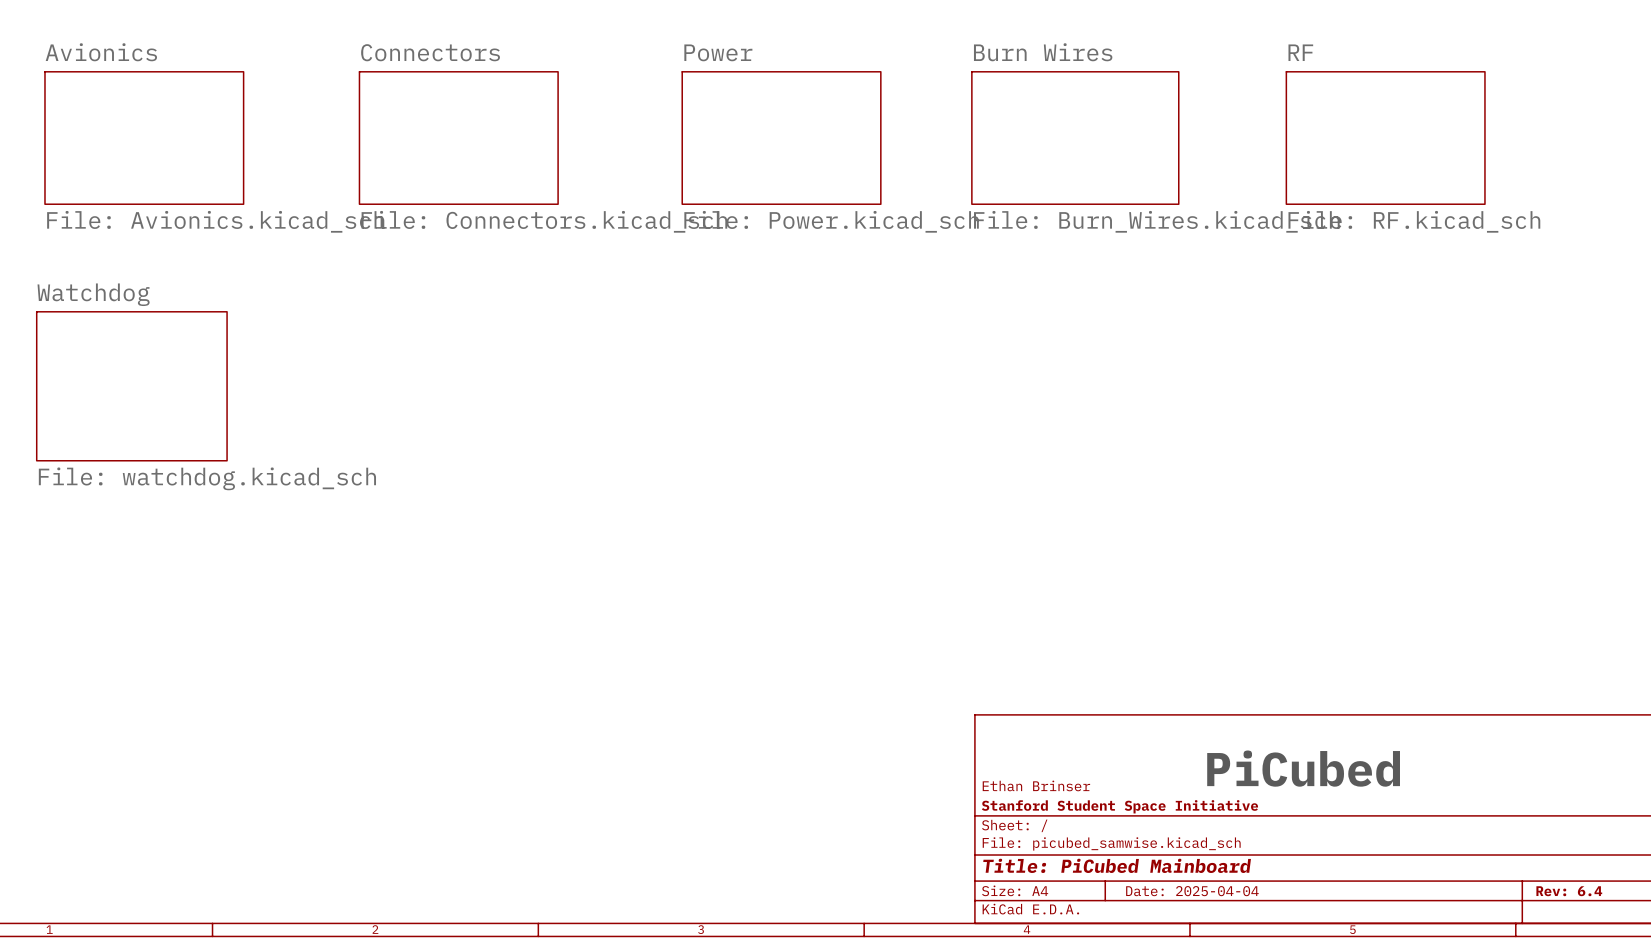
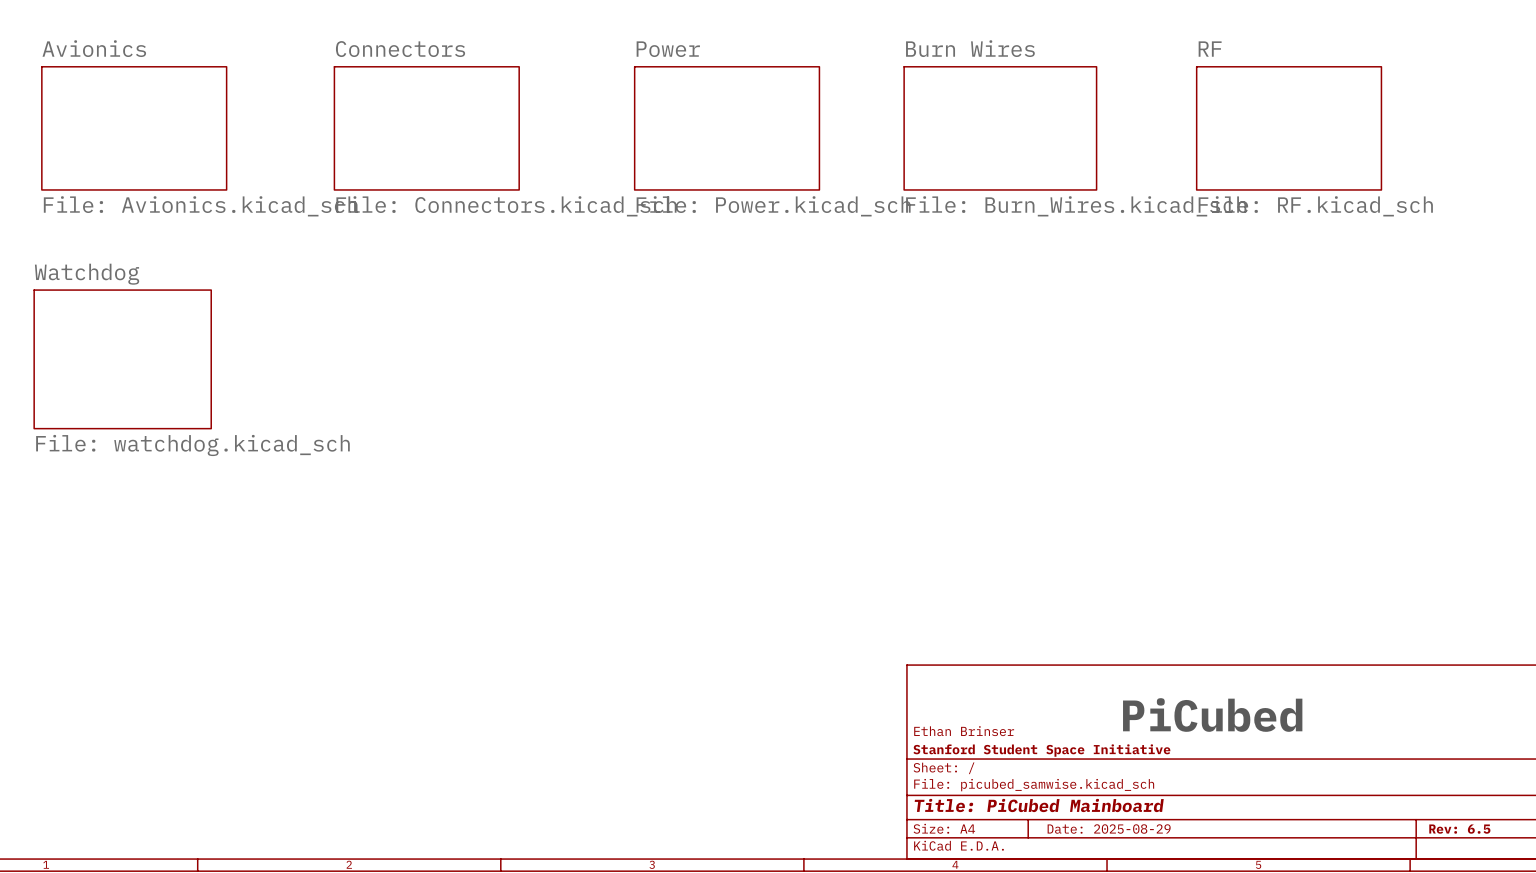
title block: Date: 2025-04-04 (1192, 891) -> Date: 2025-08-29 (1109, 829)
title block: Rev: 6.4 (1569, 891) -> Rev: 6.5 (1459, 829)

